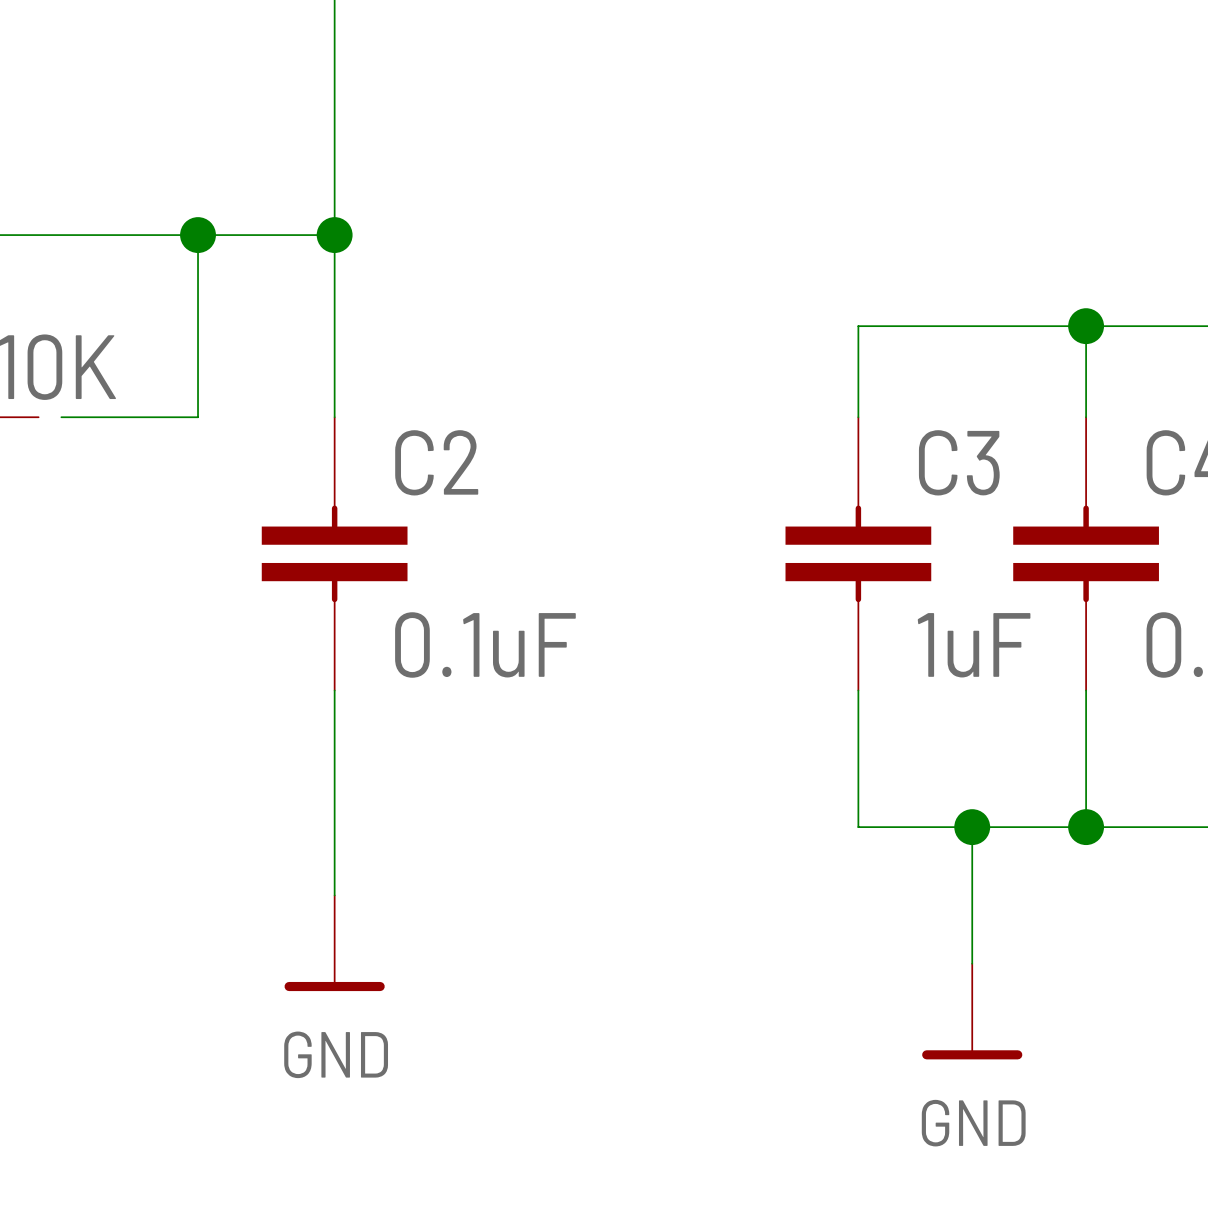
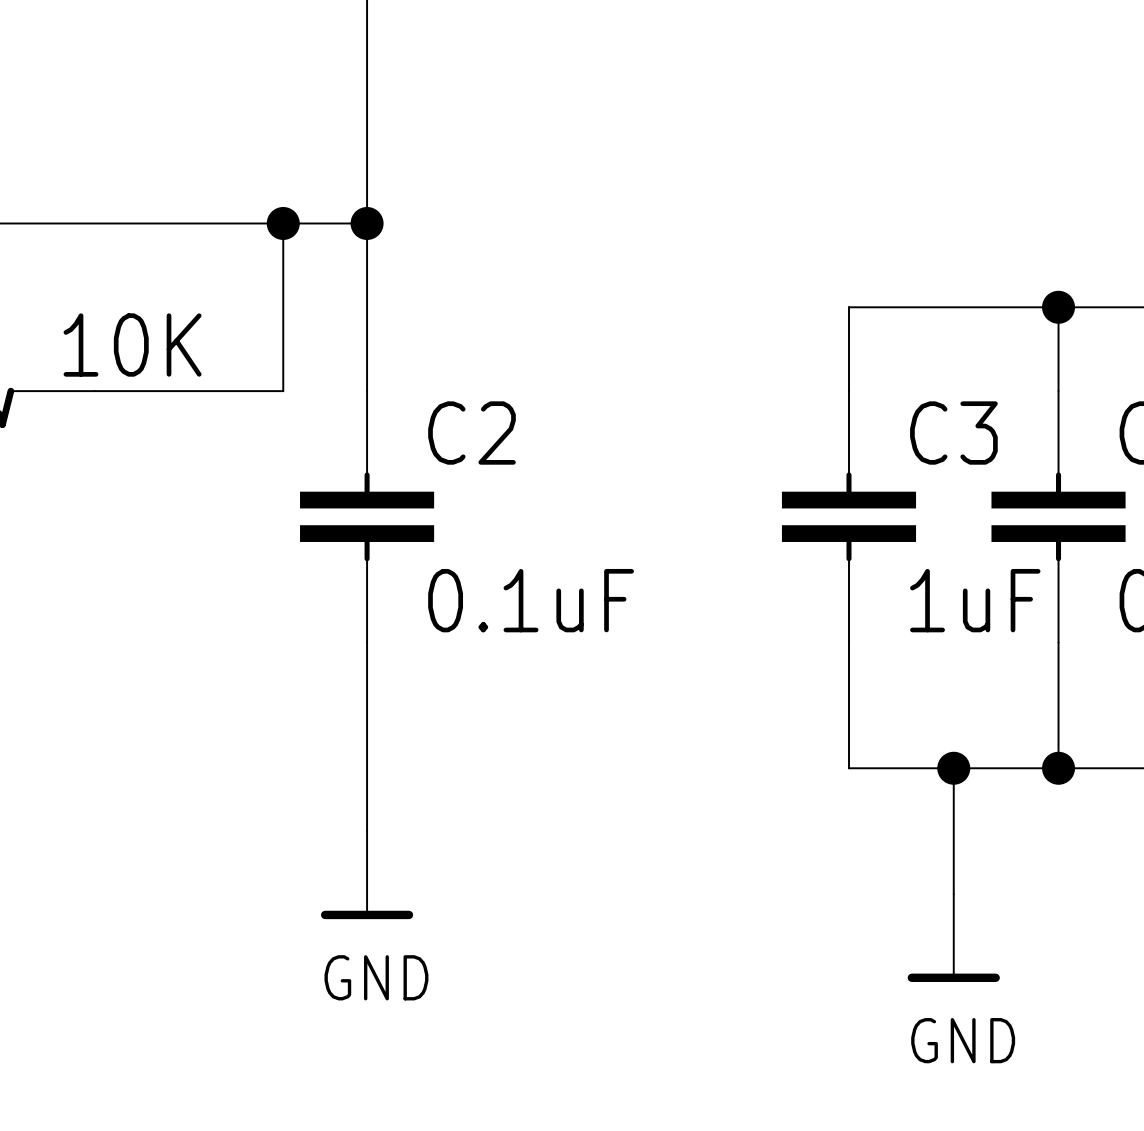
wire: (198, 235) (198, 417) -> (283, 223) (283, 391) (241, 391)
junction position: (198, 235) -> (283, 223)
wire: none -> (94, 391) (115, 391)

